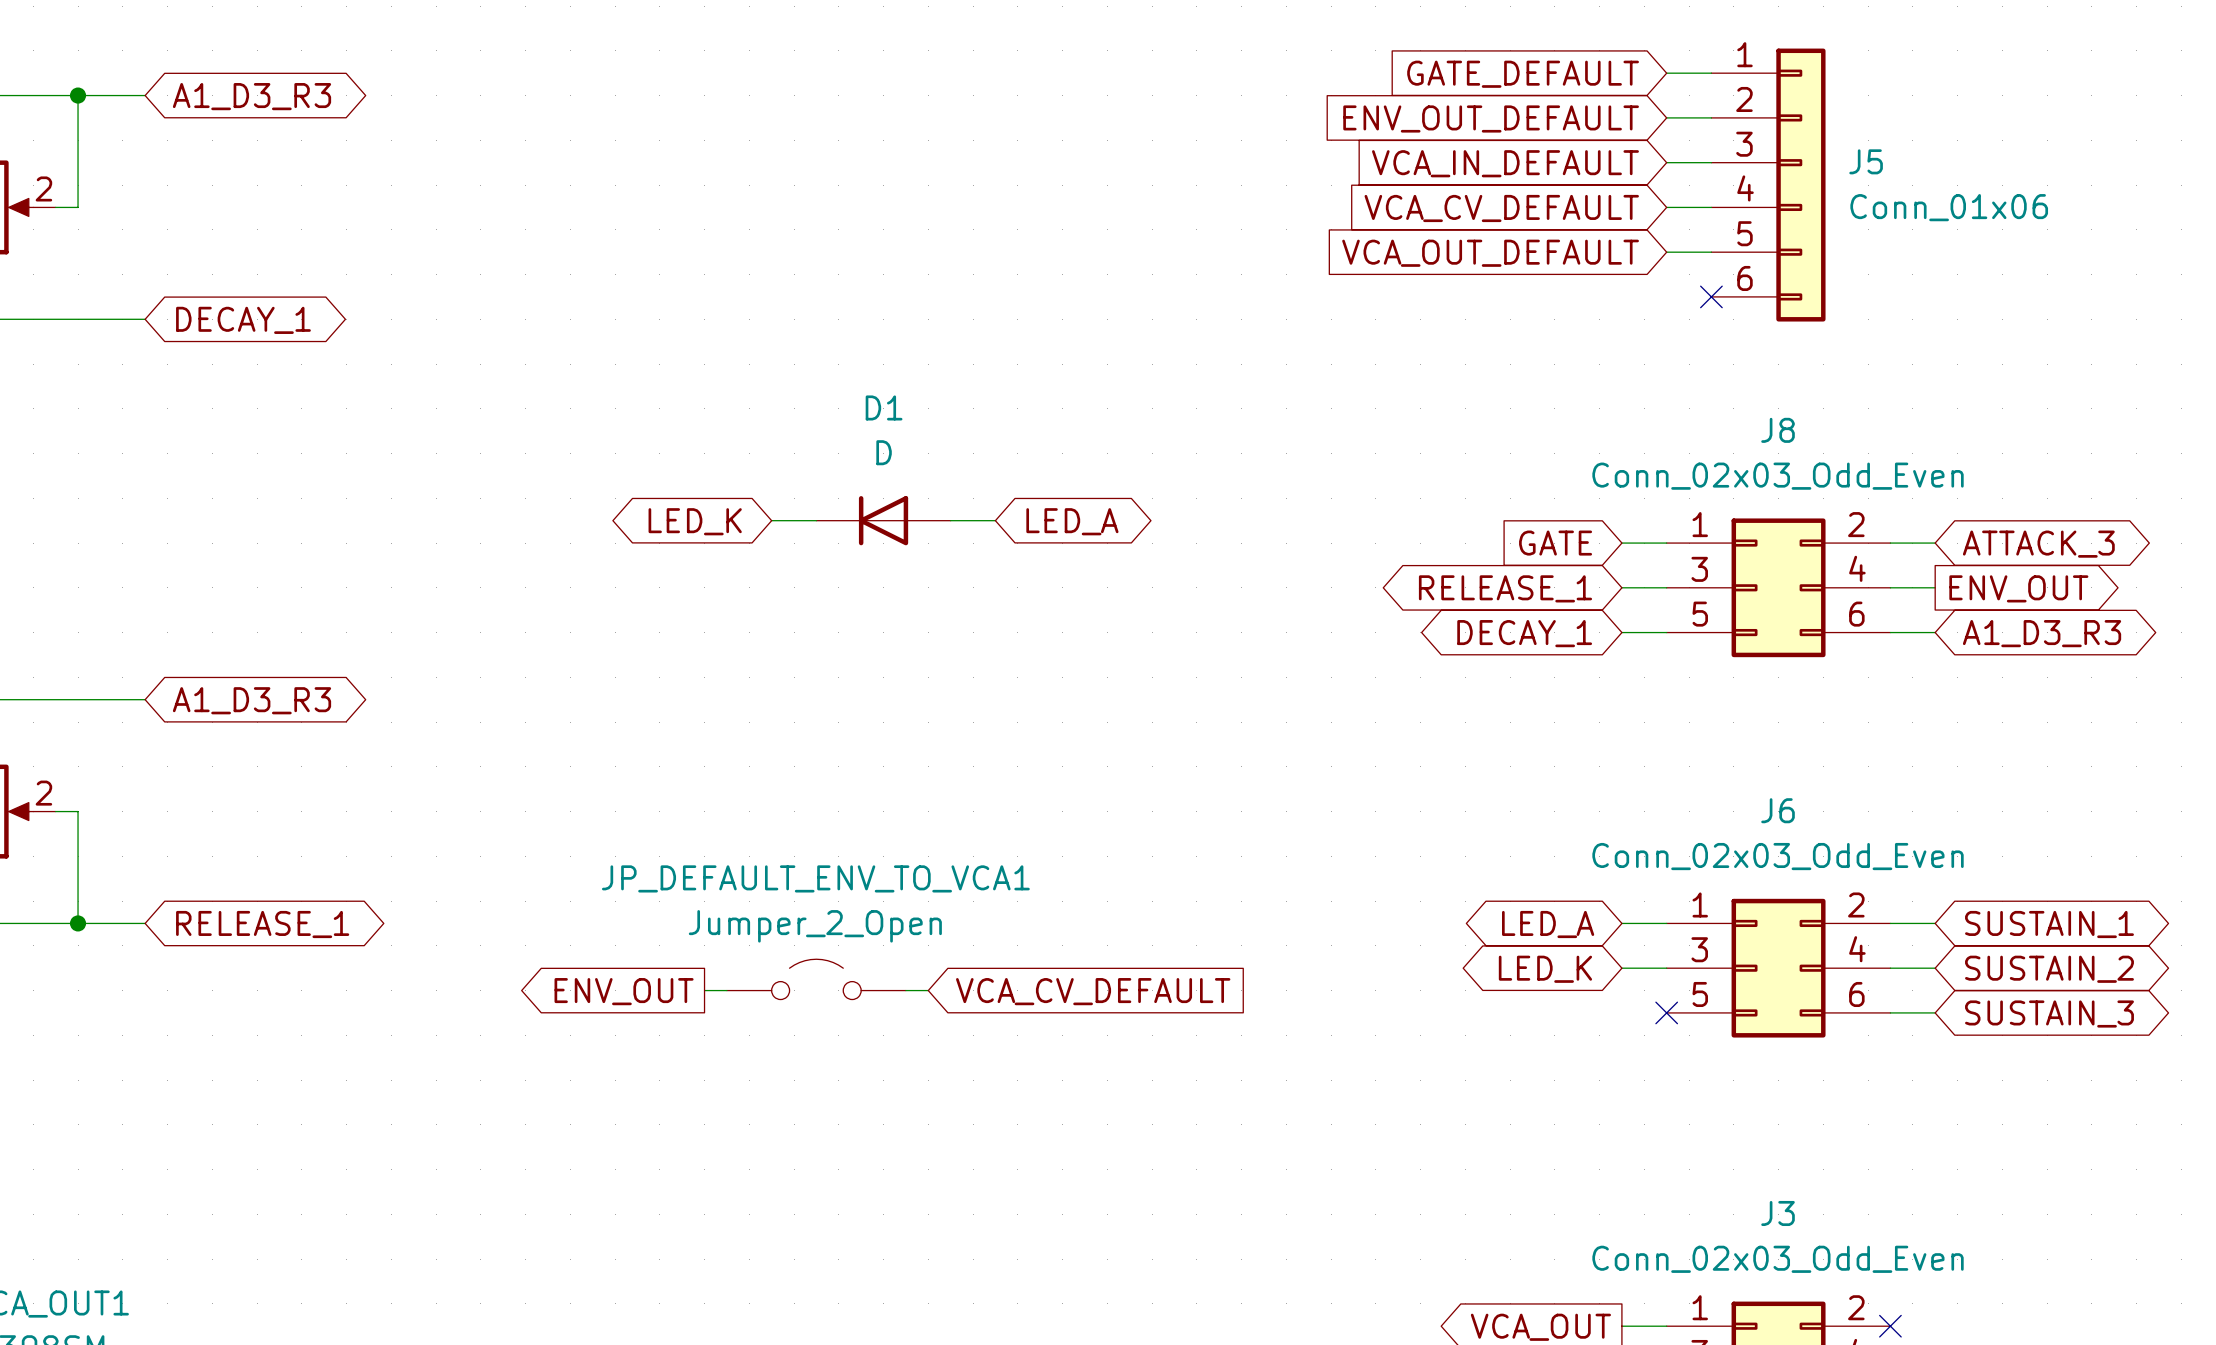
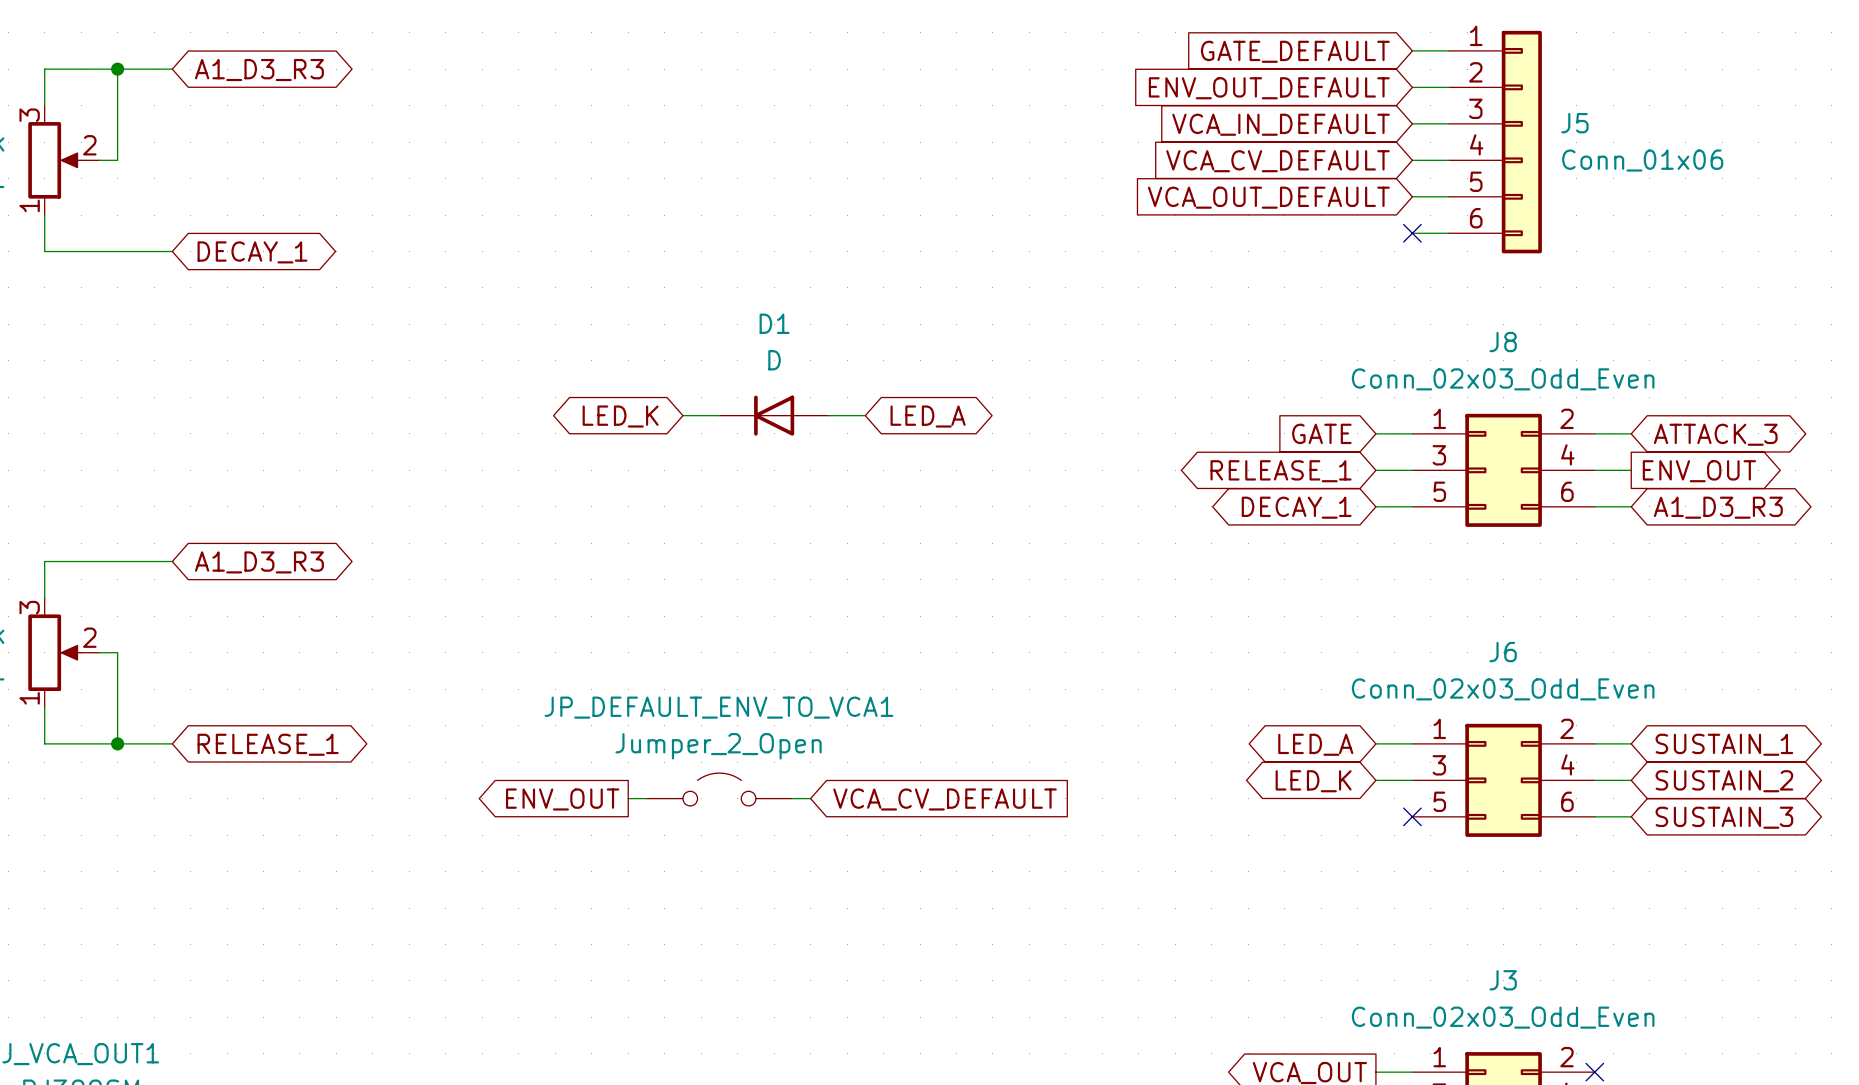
wire: none -> (1412, 233) (1448, 233)
no-connect mark position: (1711, 296) -> (1412, 233)

